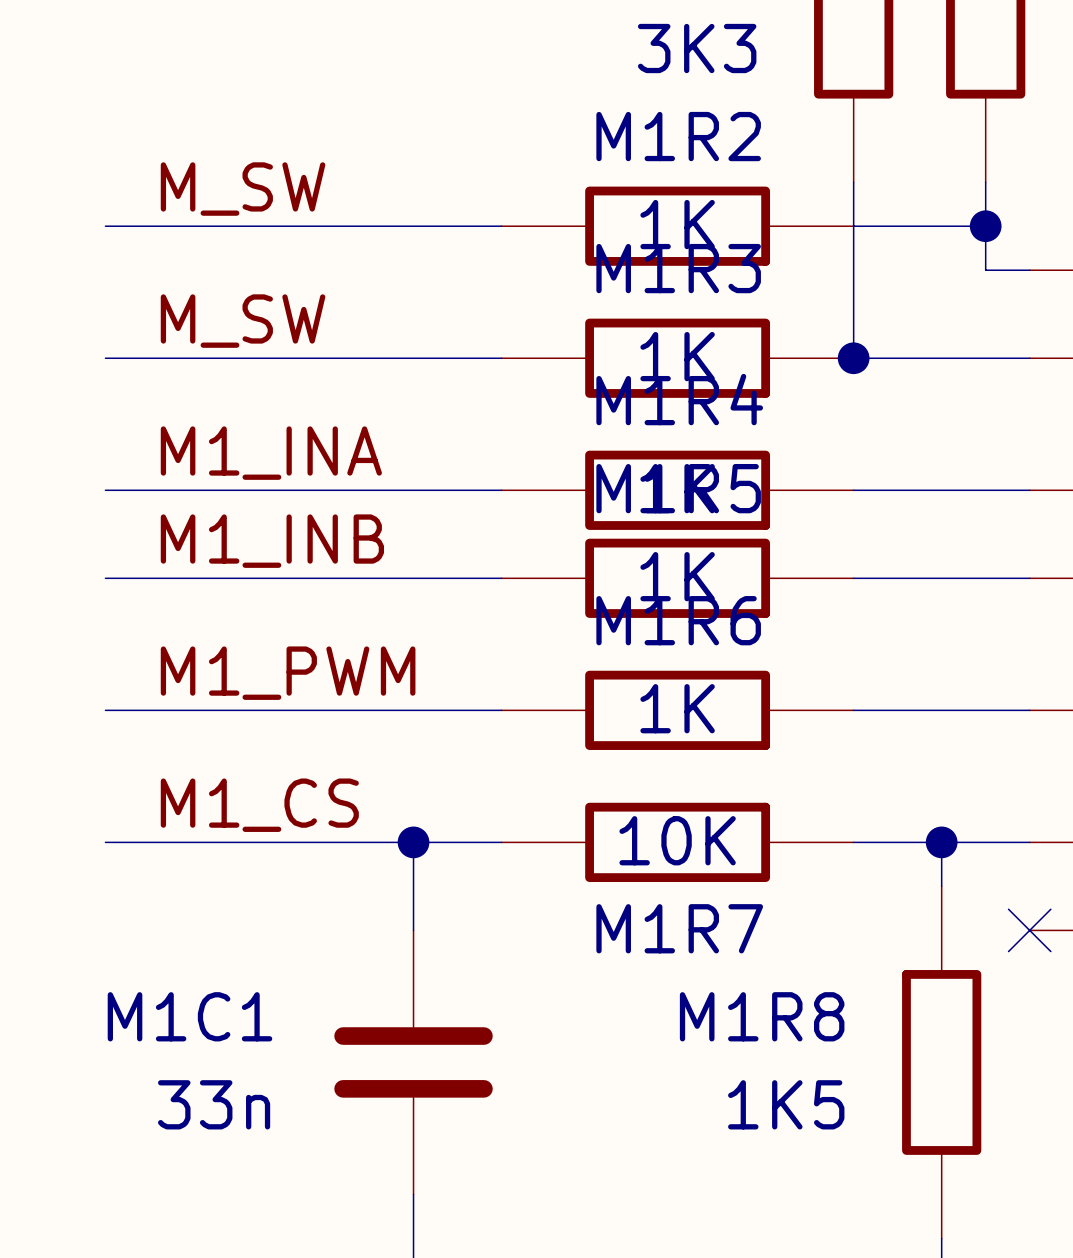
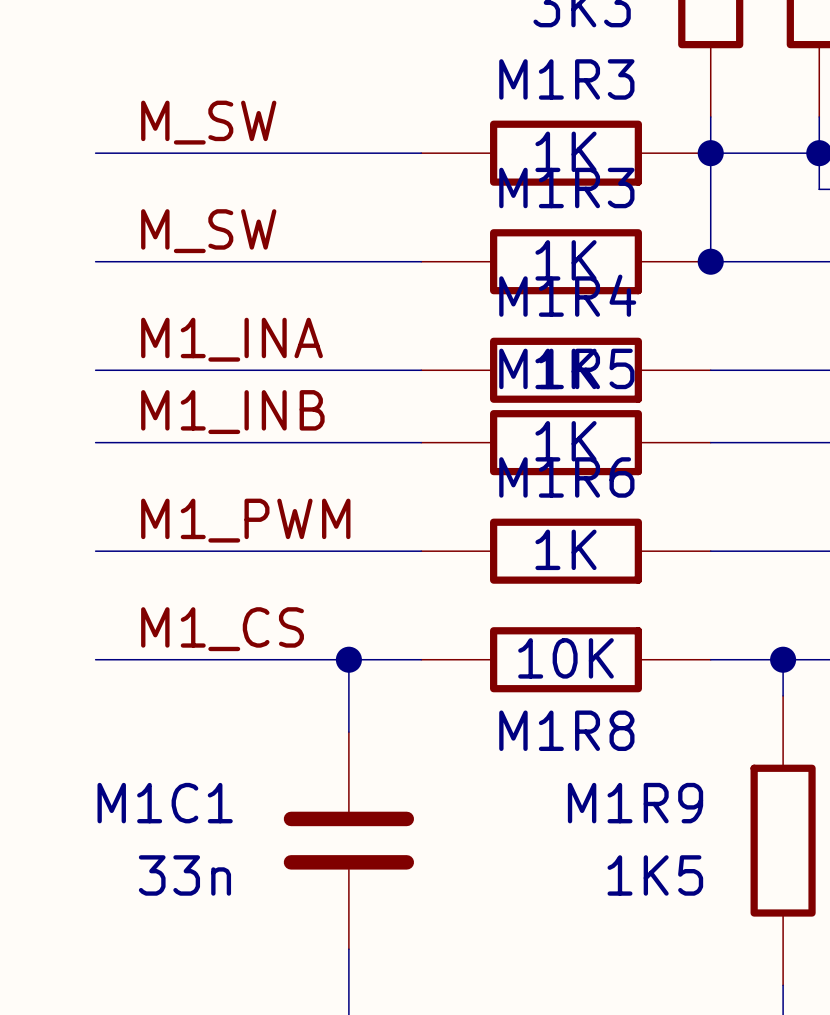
M1R2 name: M1R2 (678, 136) -> M1R3 (566, 79)
junction: none -> (710, 153)
M1R7 name: M1R7 (679, 928) -> M1R8 (566, 730)
M1R8 name: M1R8 (762, 1016) -> M1R9 (635, 803)

